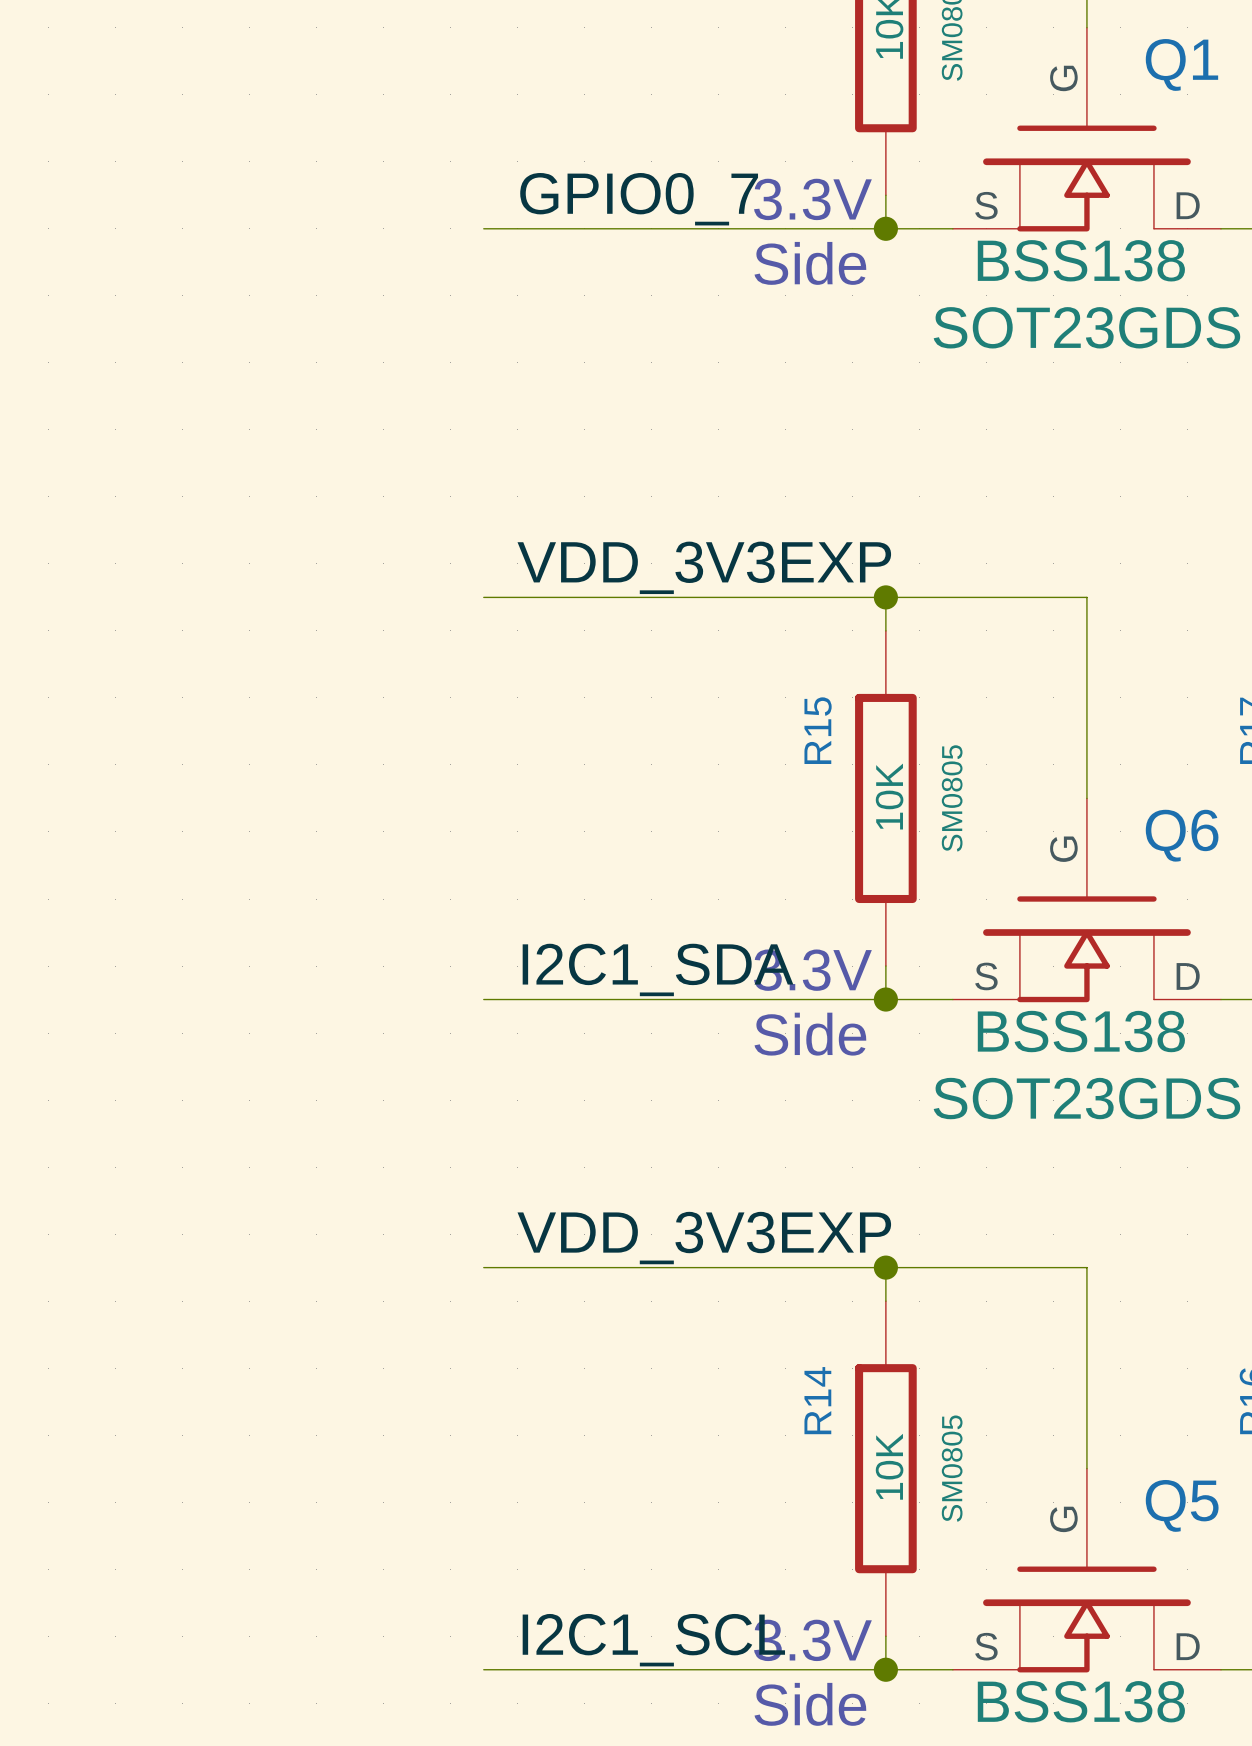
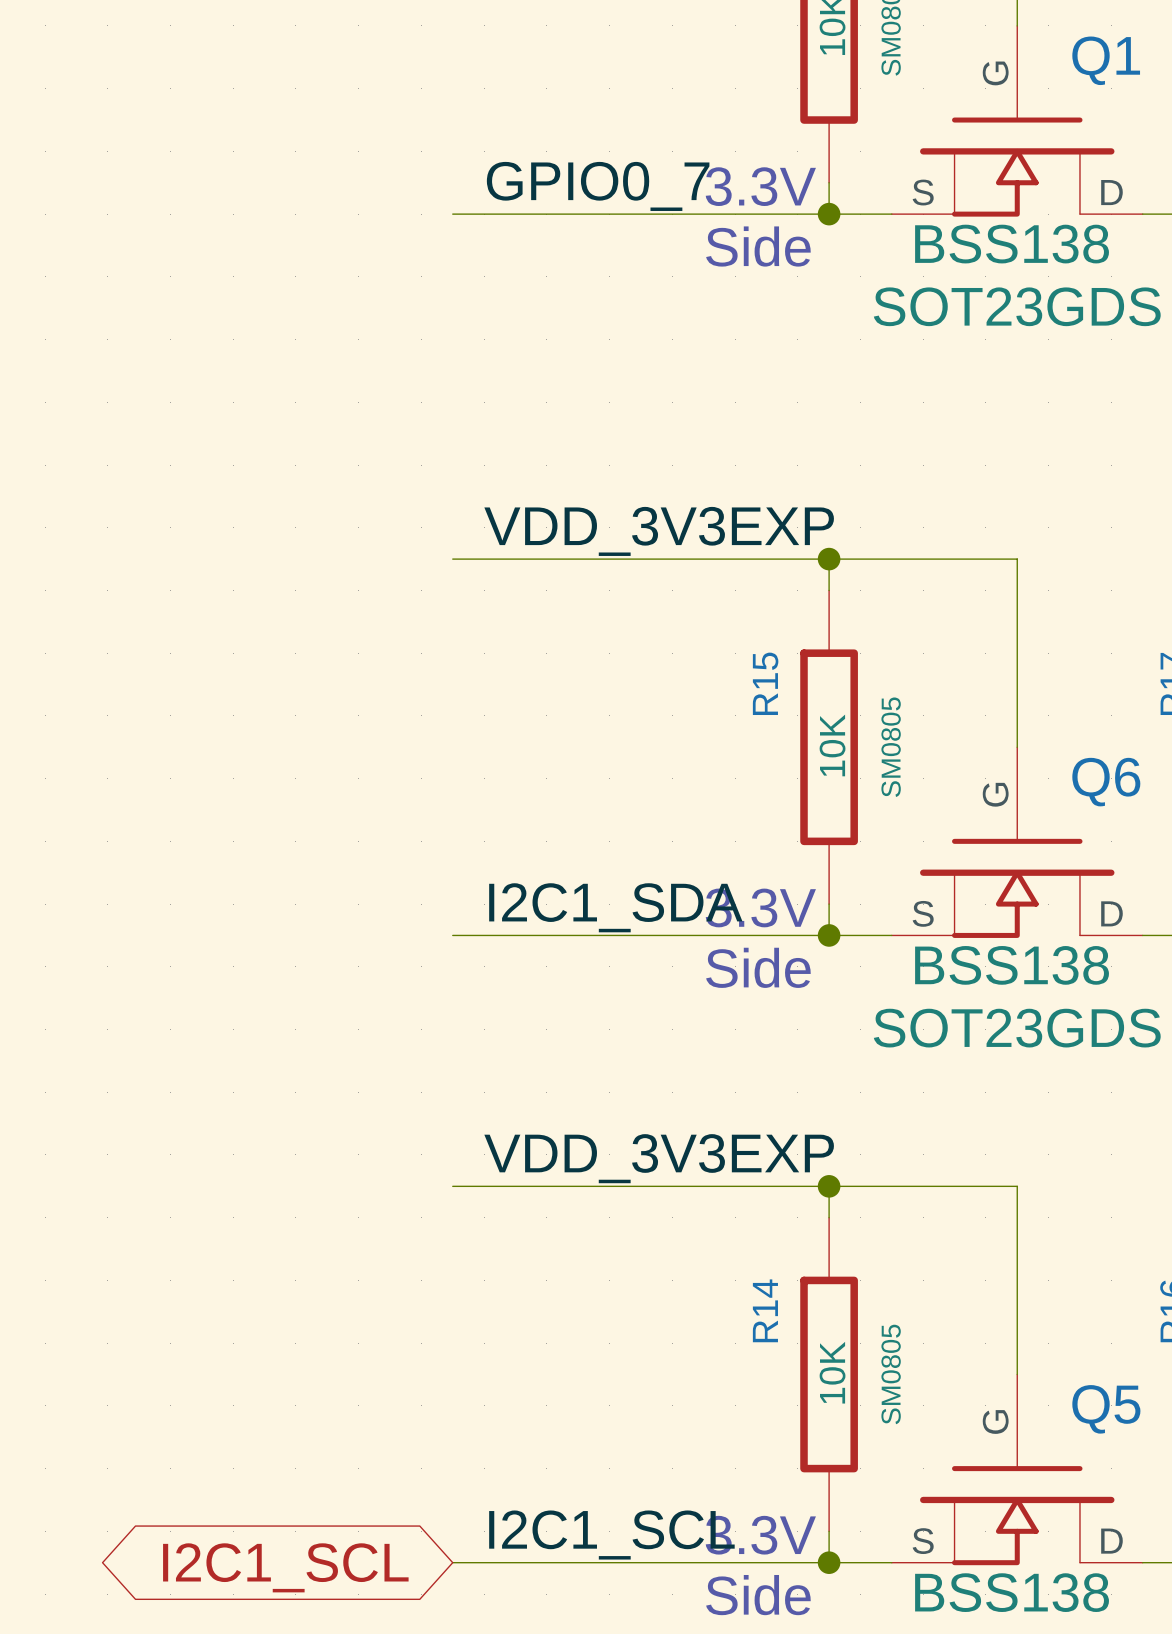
global label: none -> I2C1_SCL (285, 1567)

